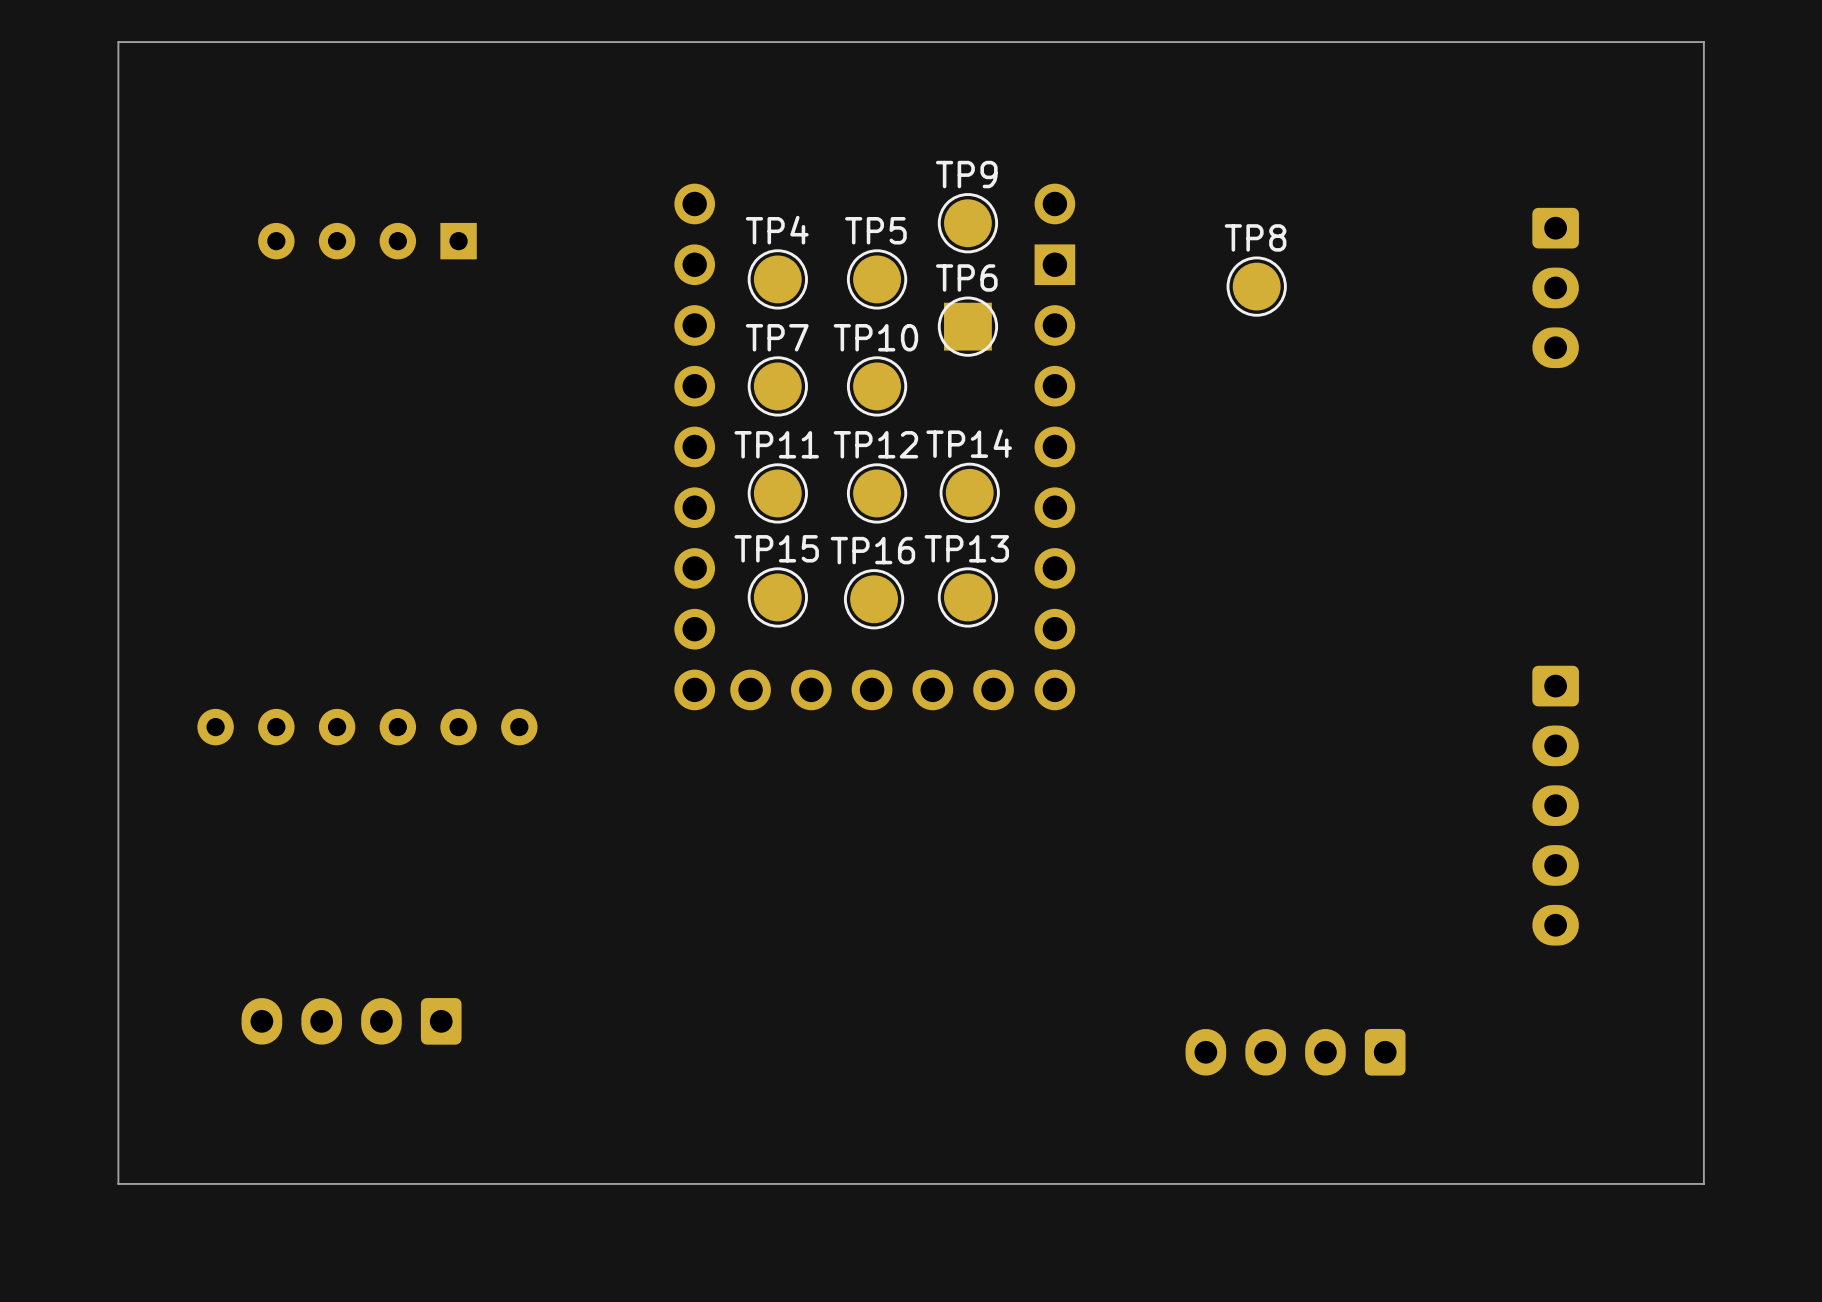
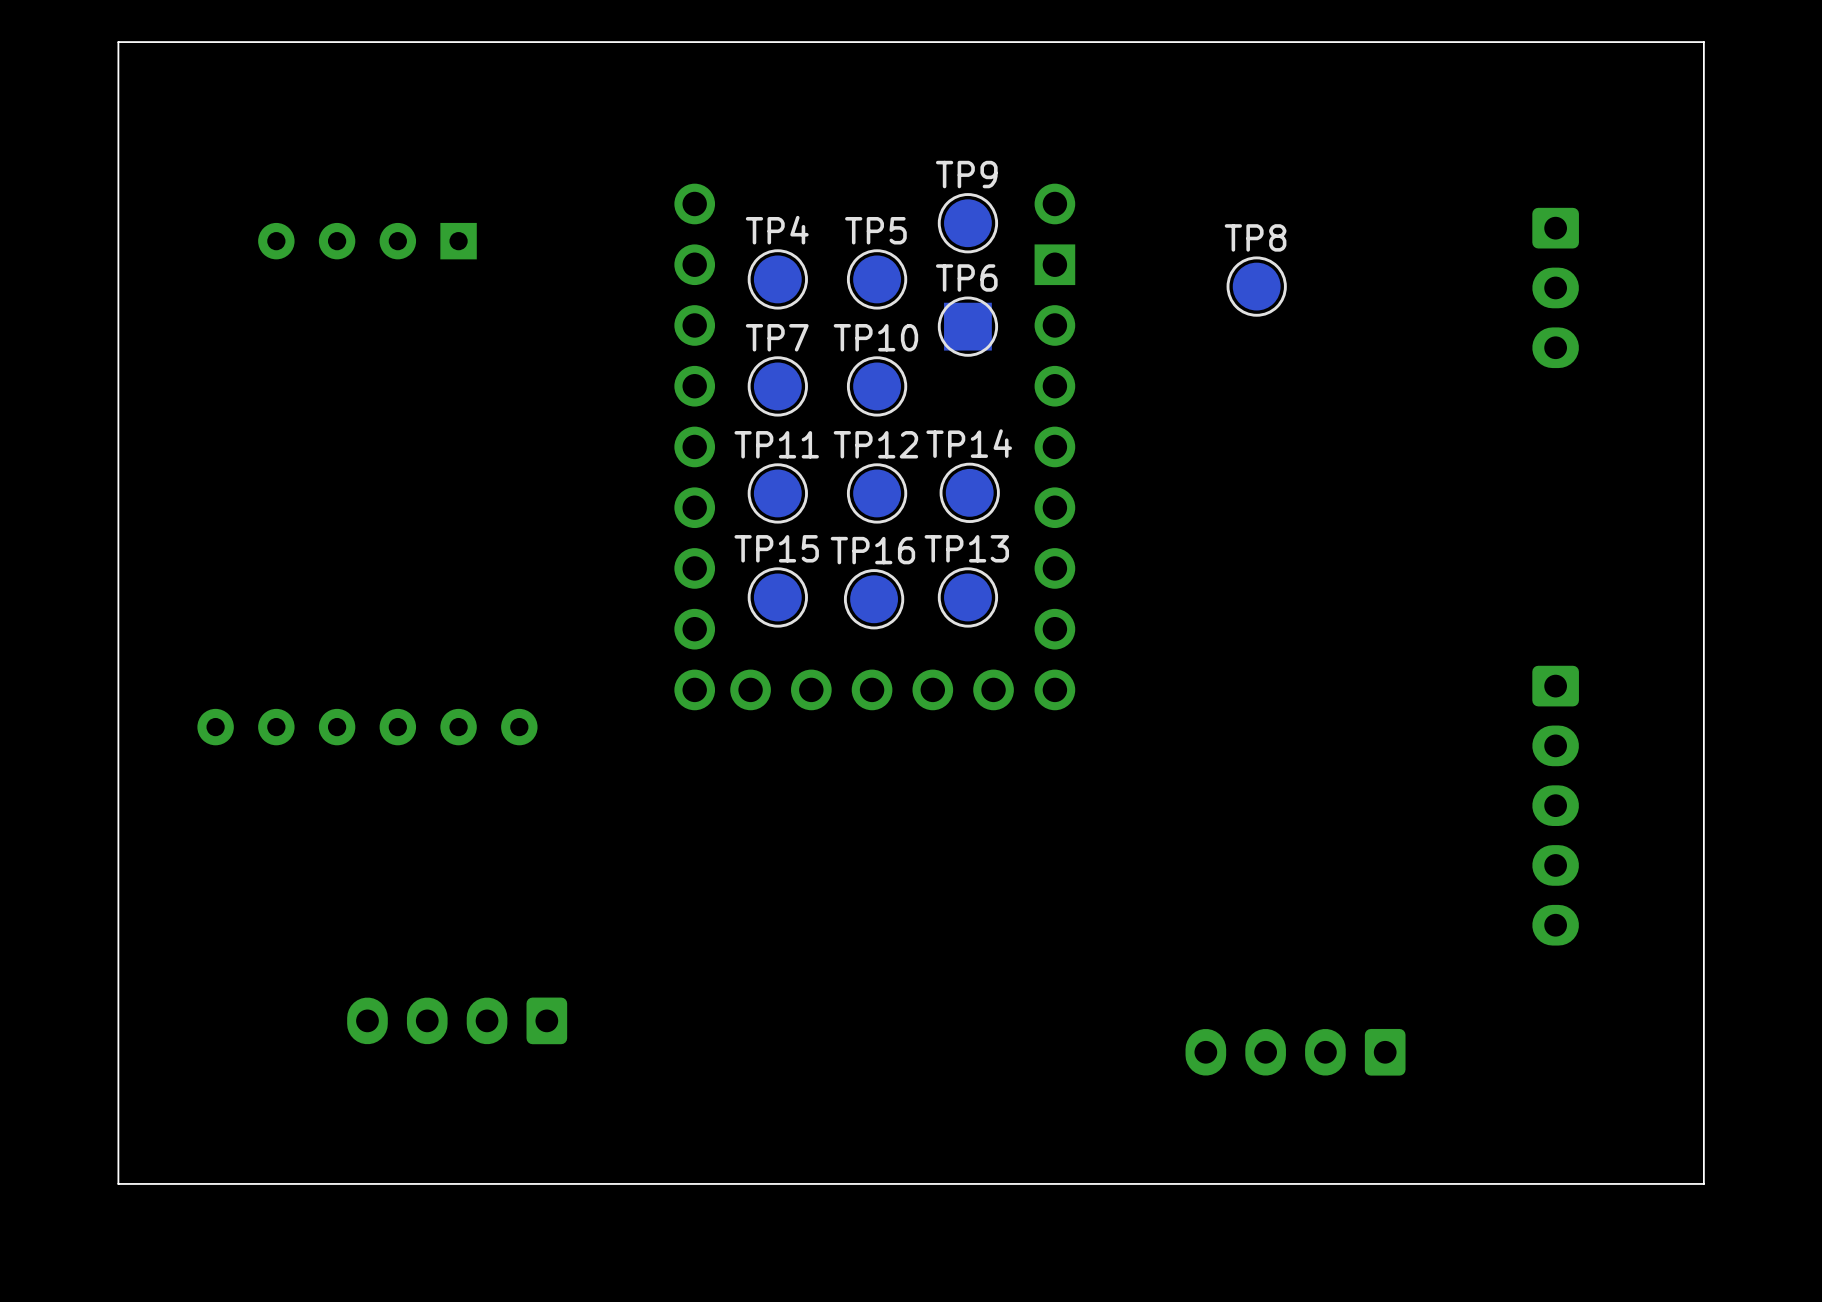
part position: (351, 1021) -> (457, 1020)

